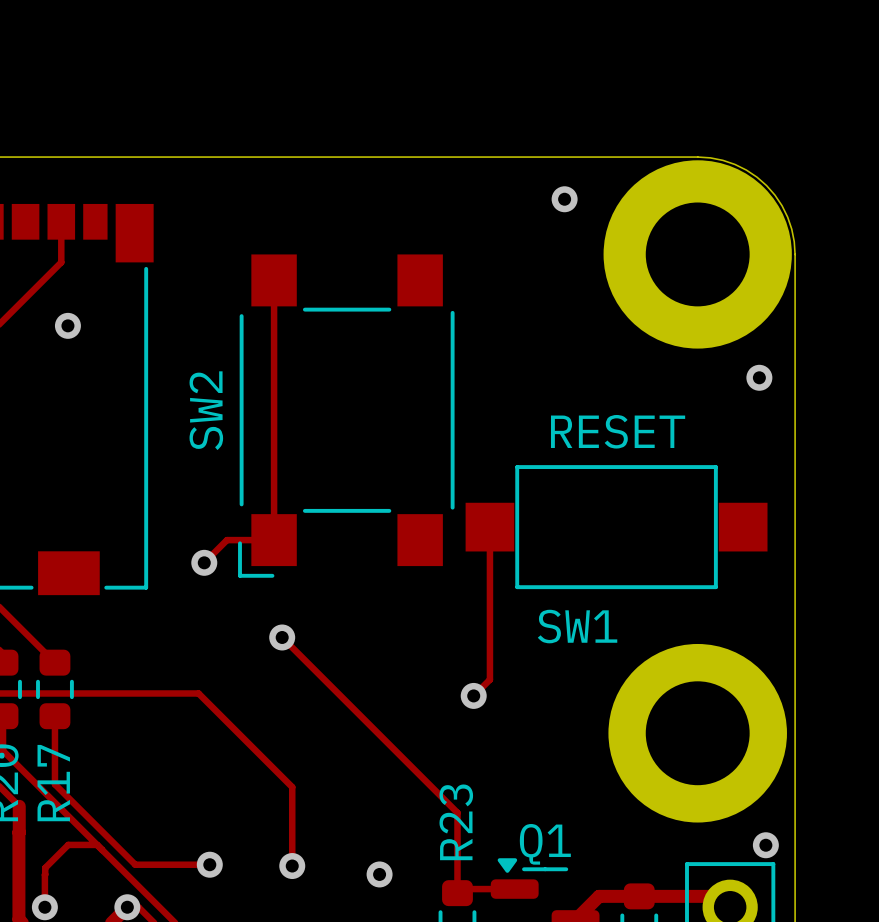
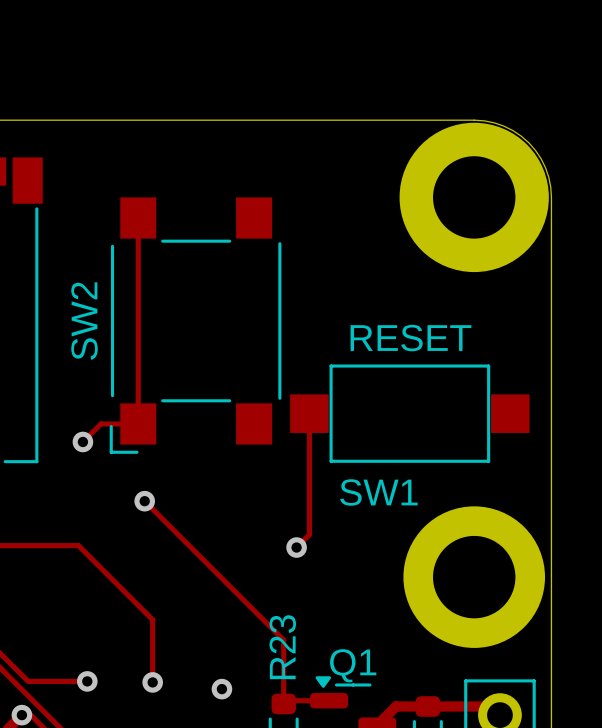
via: (564, 199) -> none
via: (759, 377) -> none
via: (765, 845) -> none

